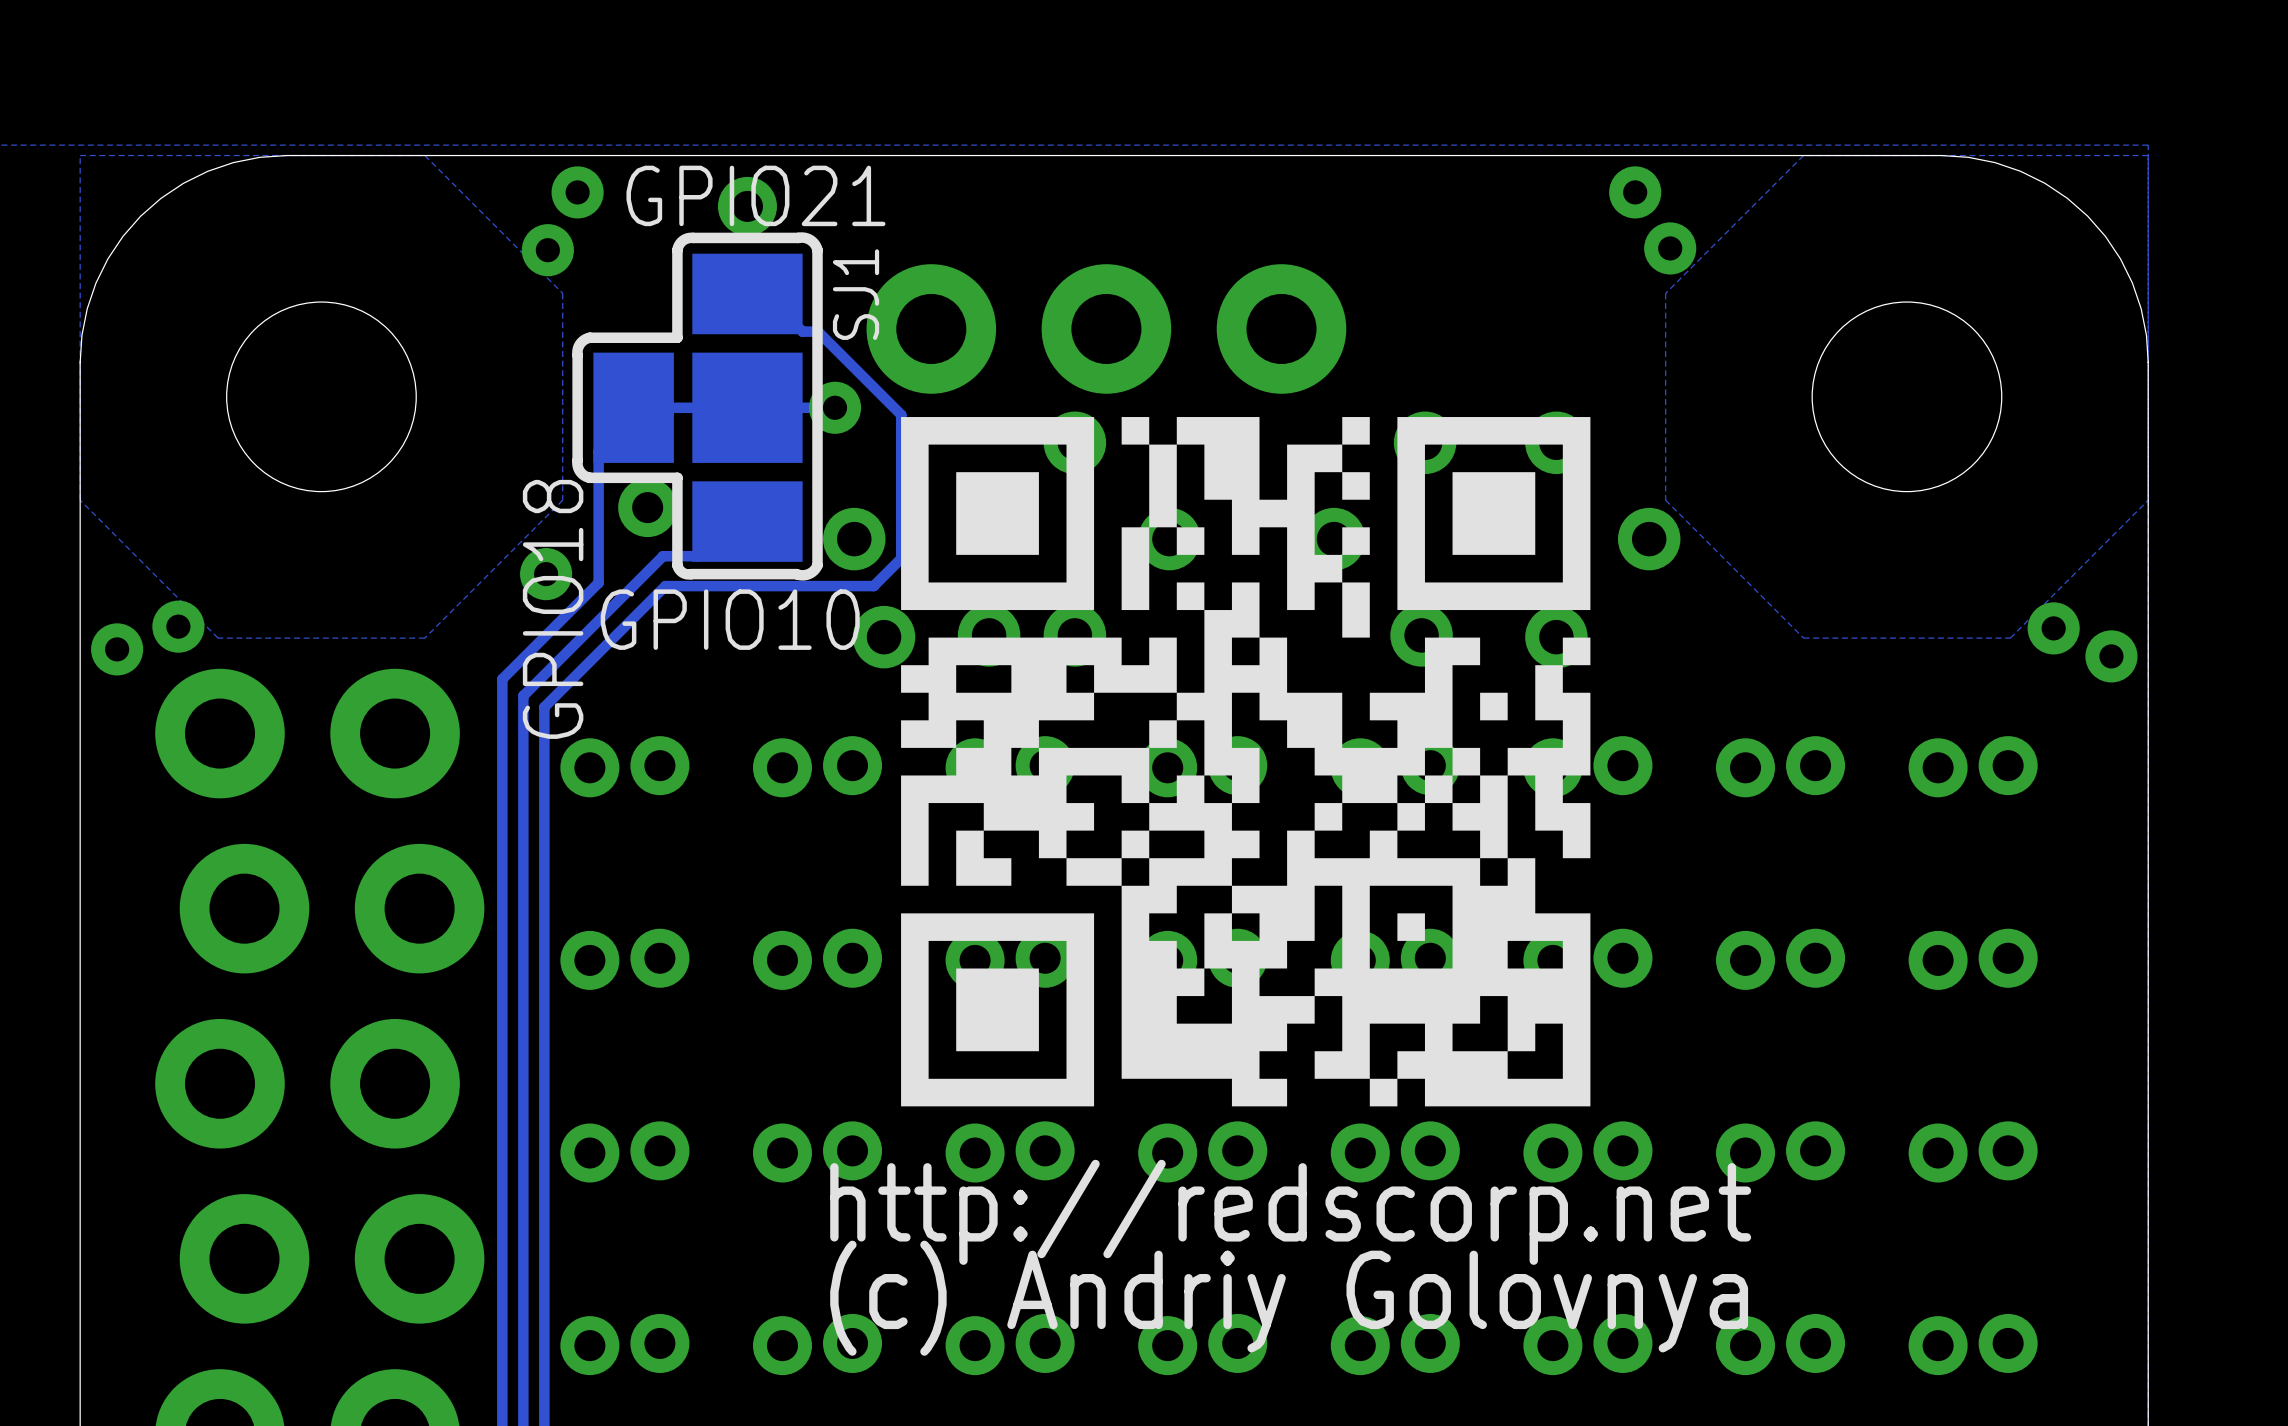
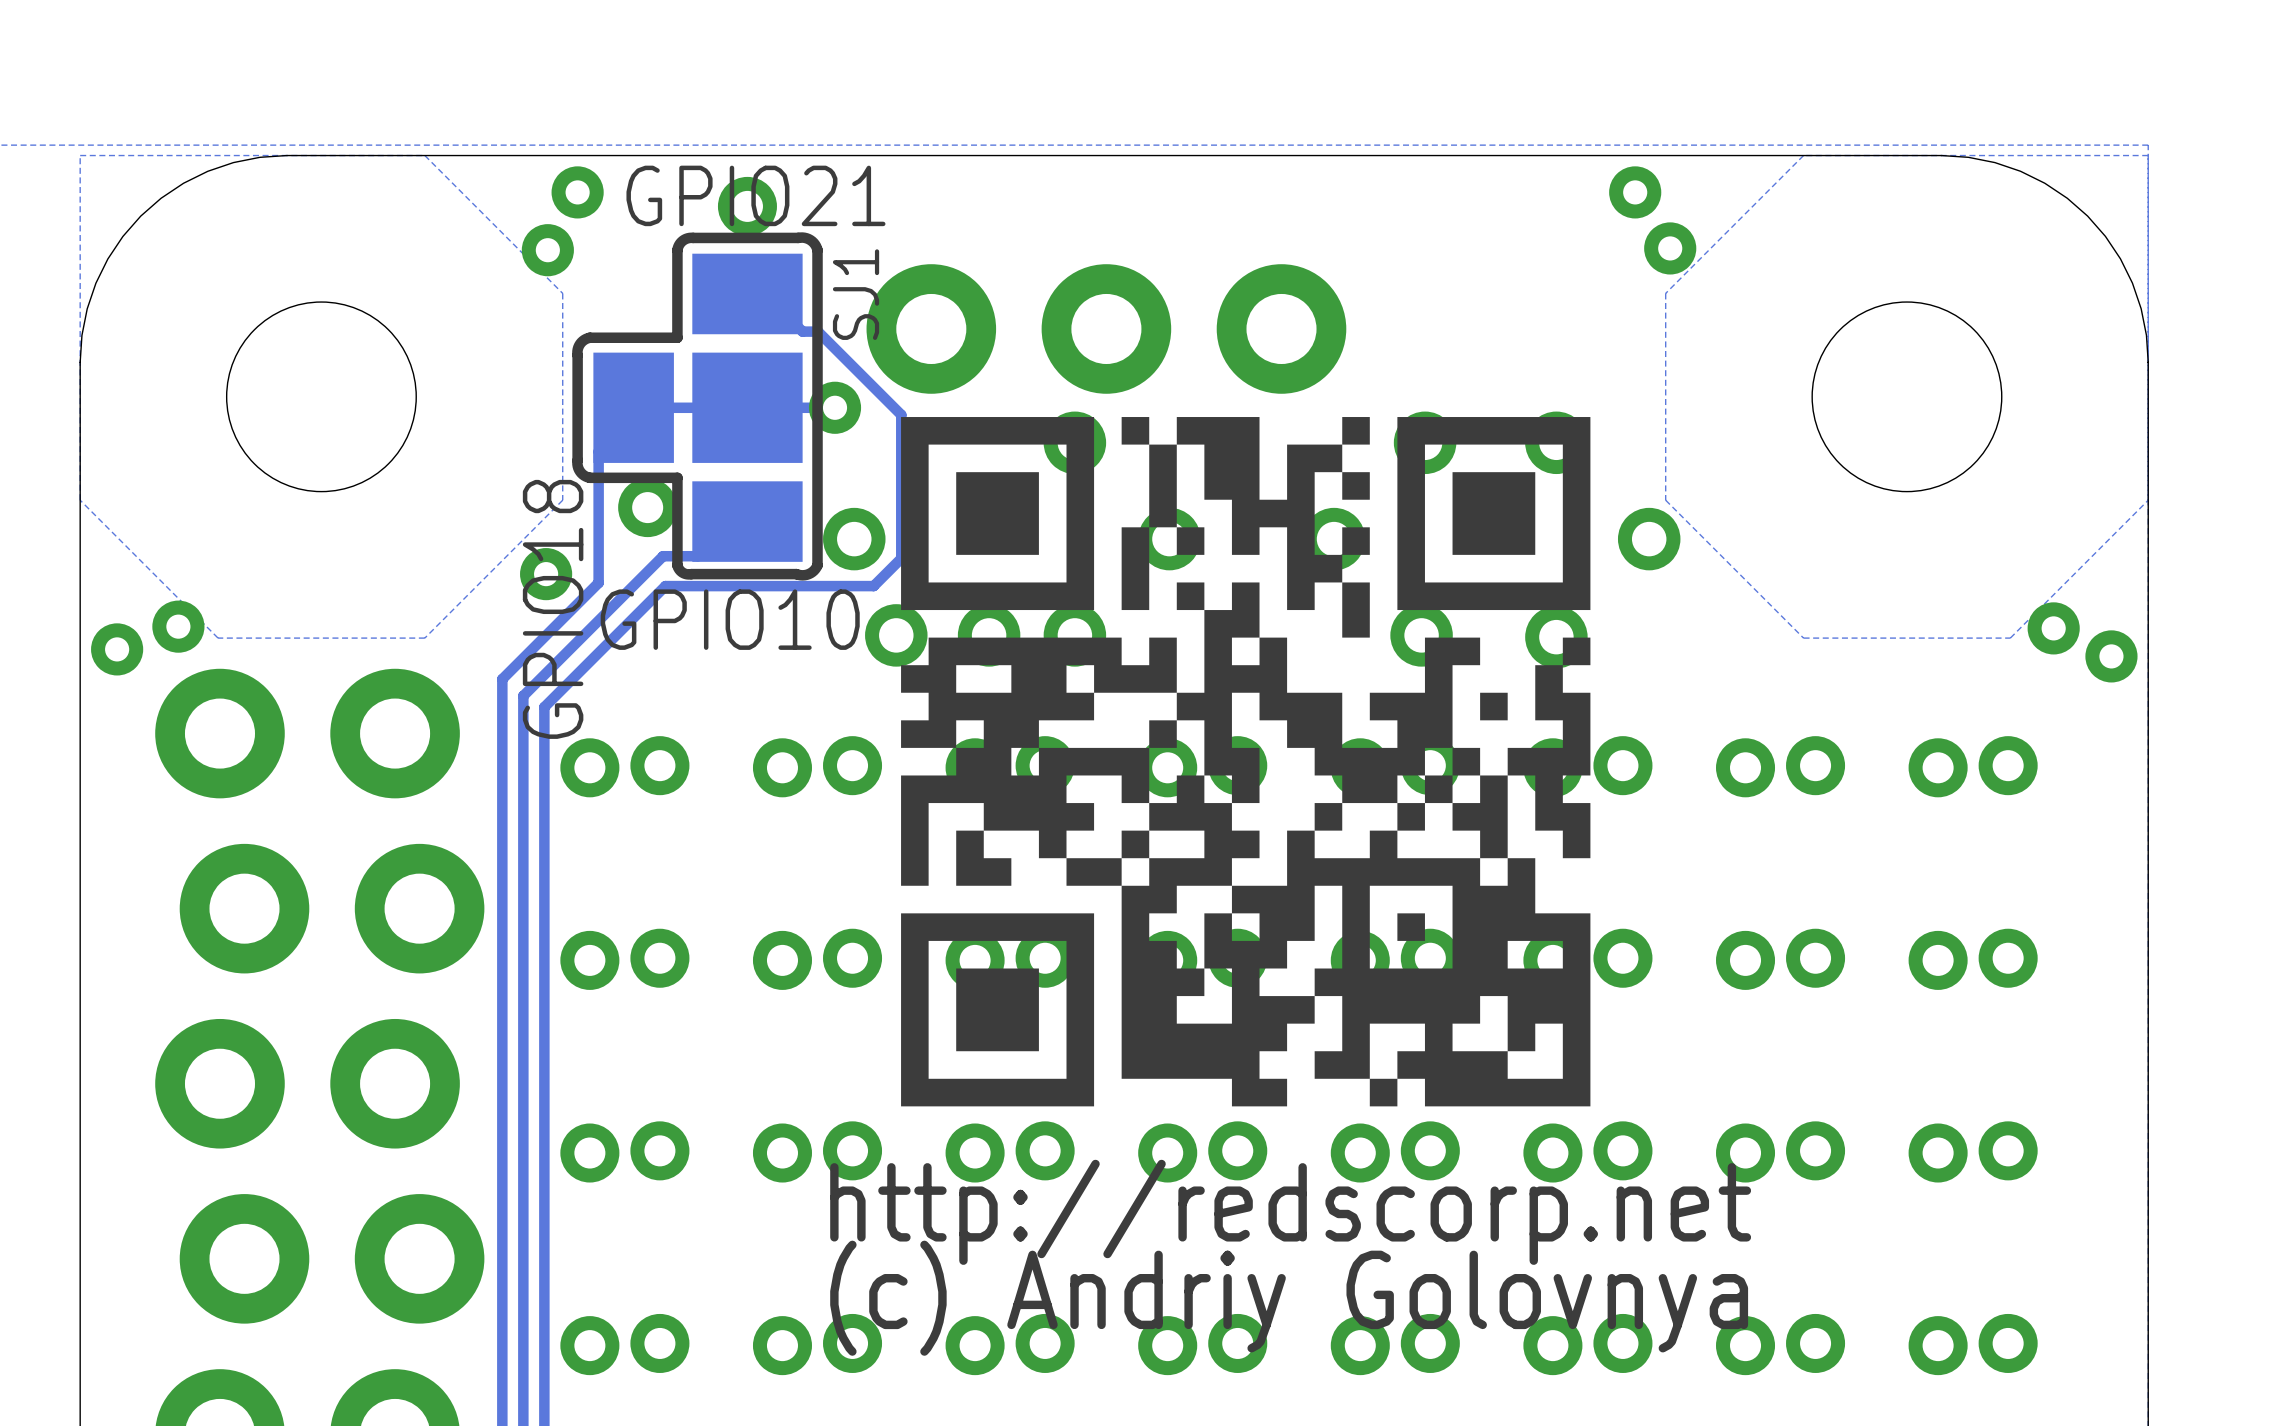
via position: (884, 637) -> (896, 635)

